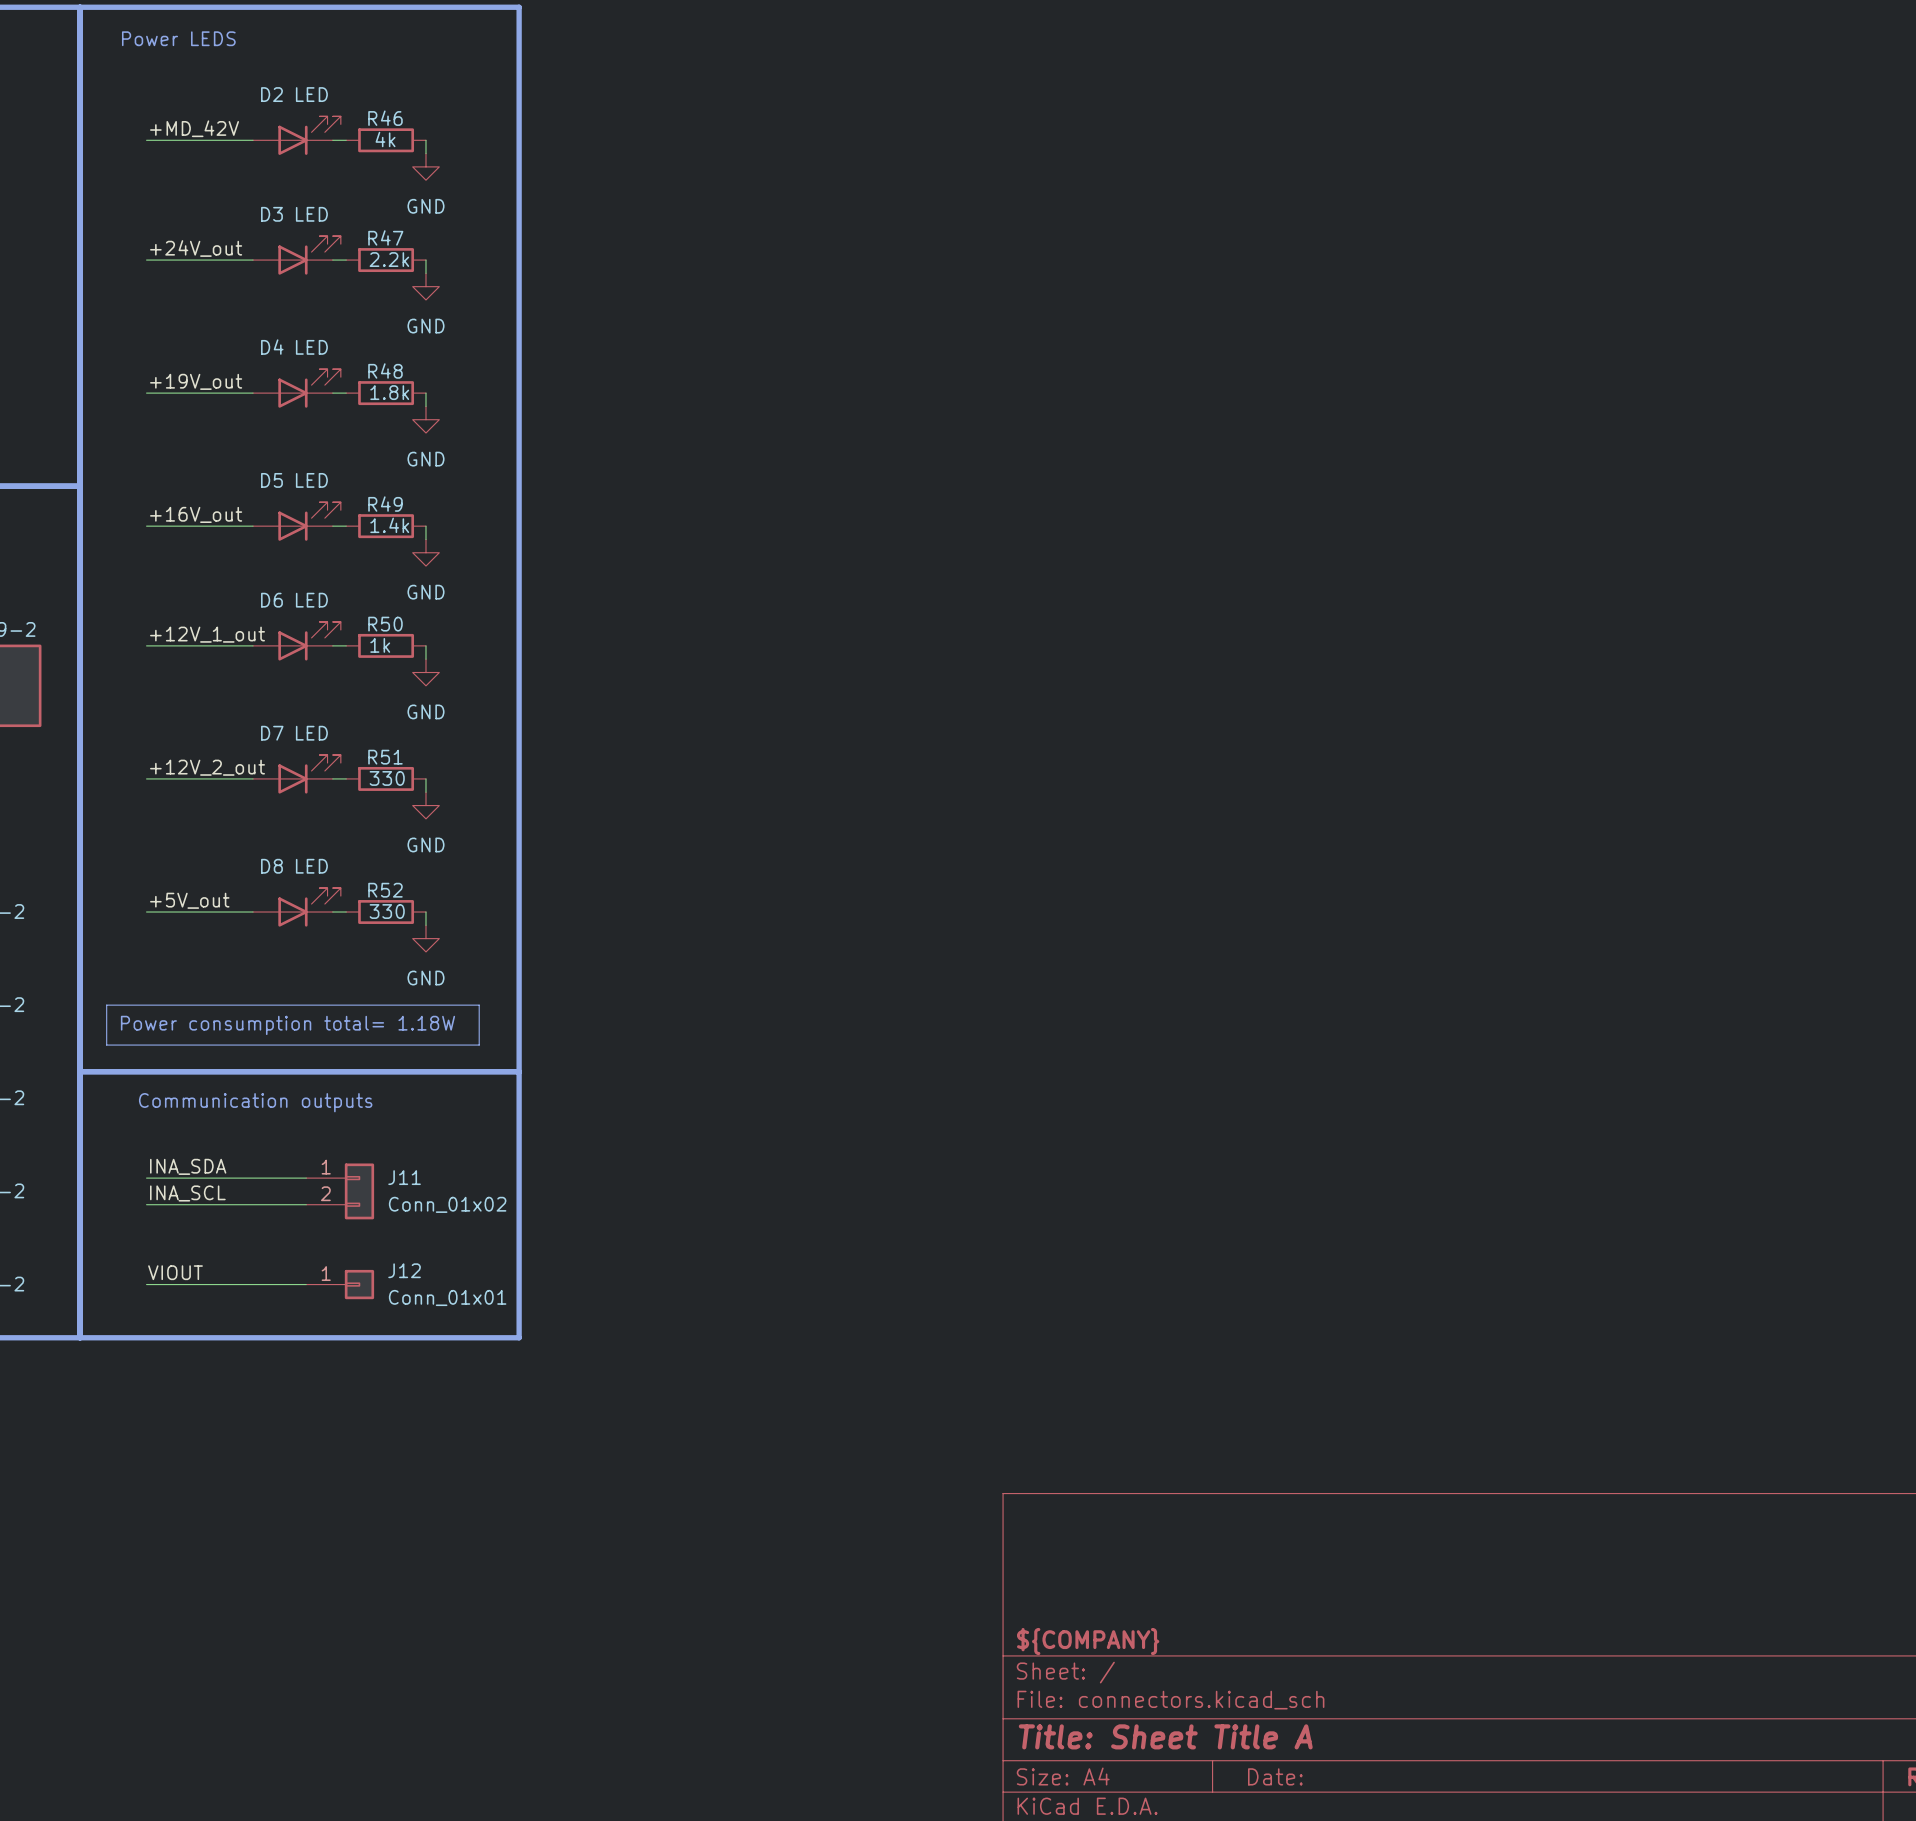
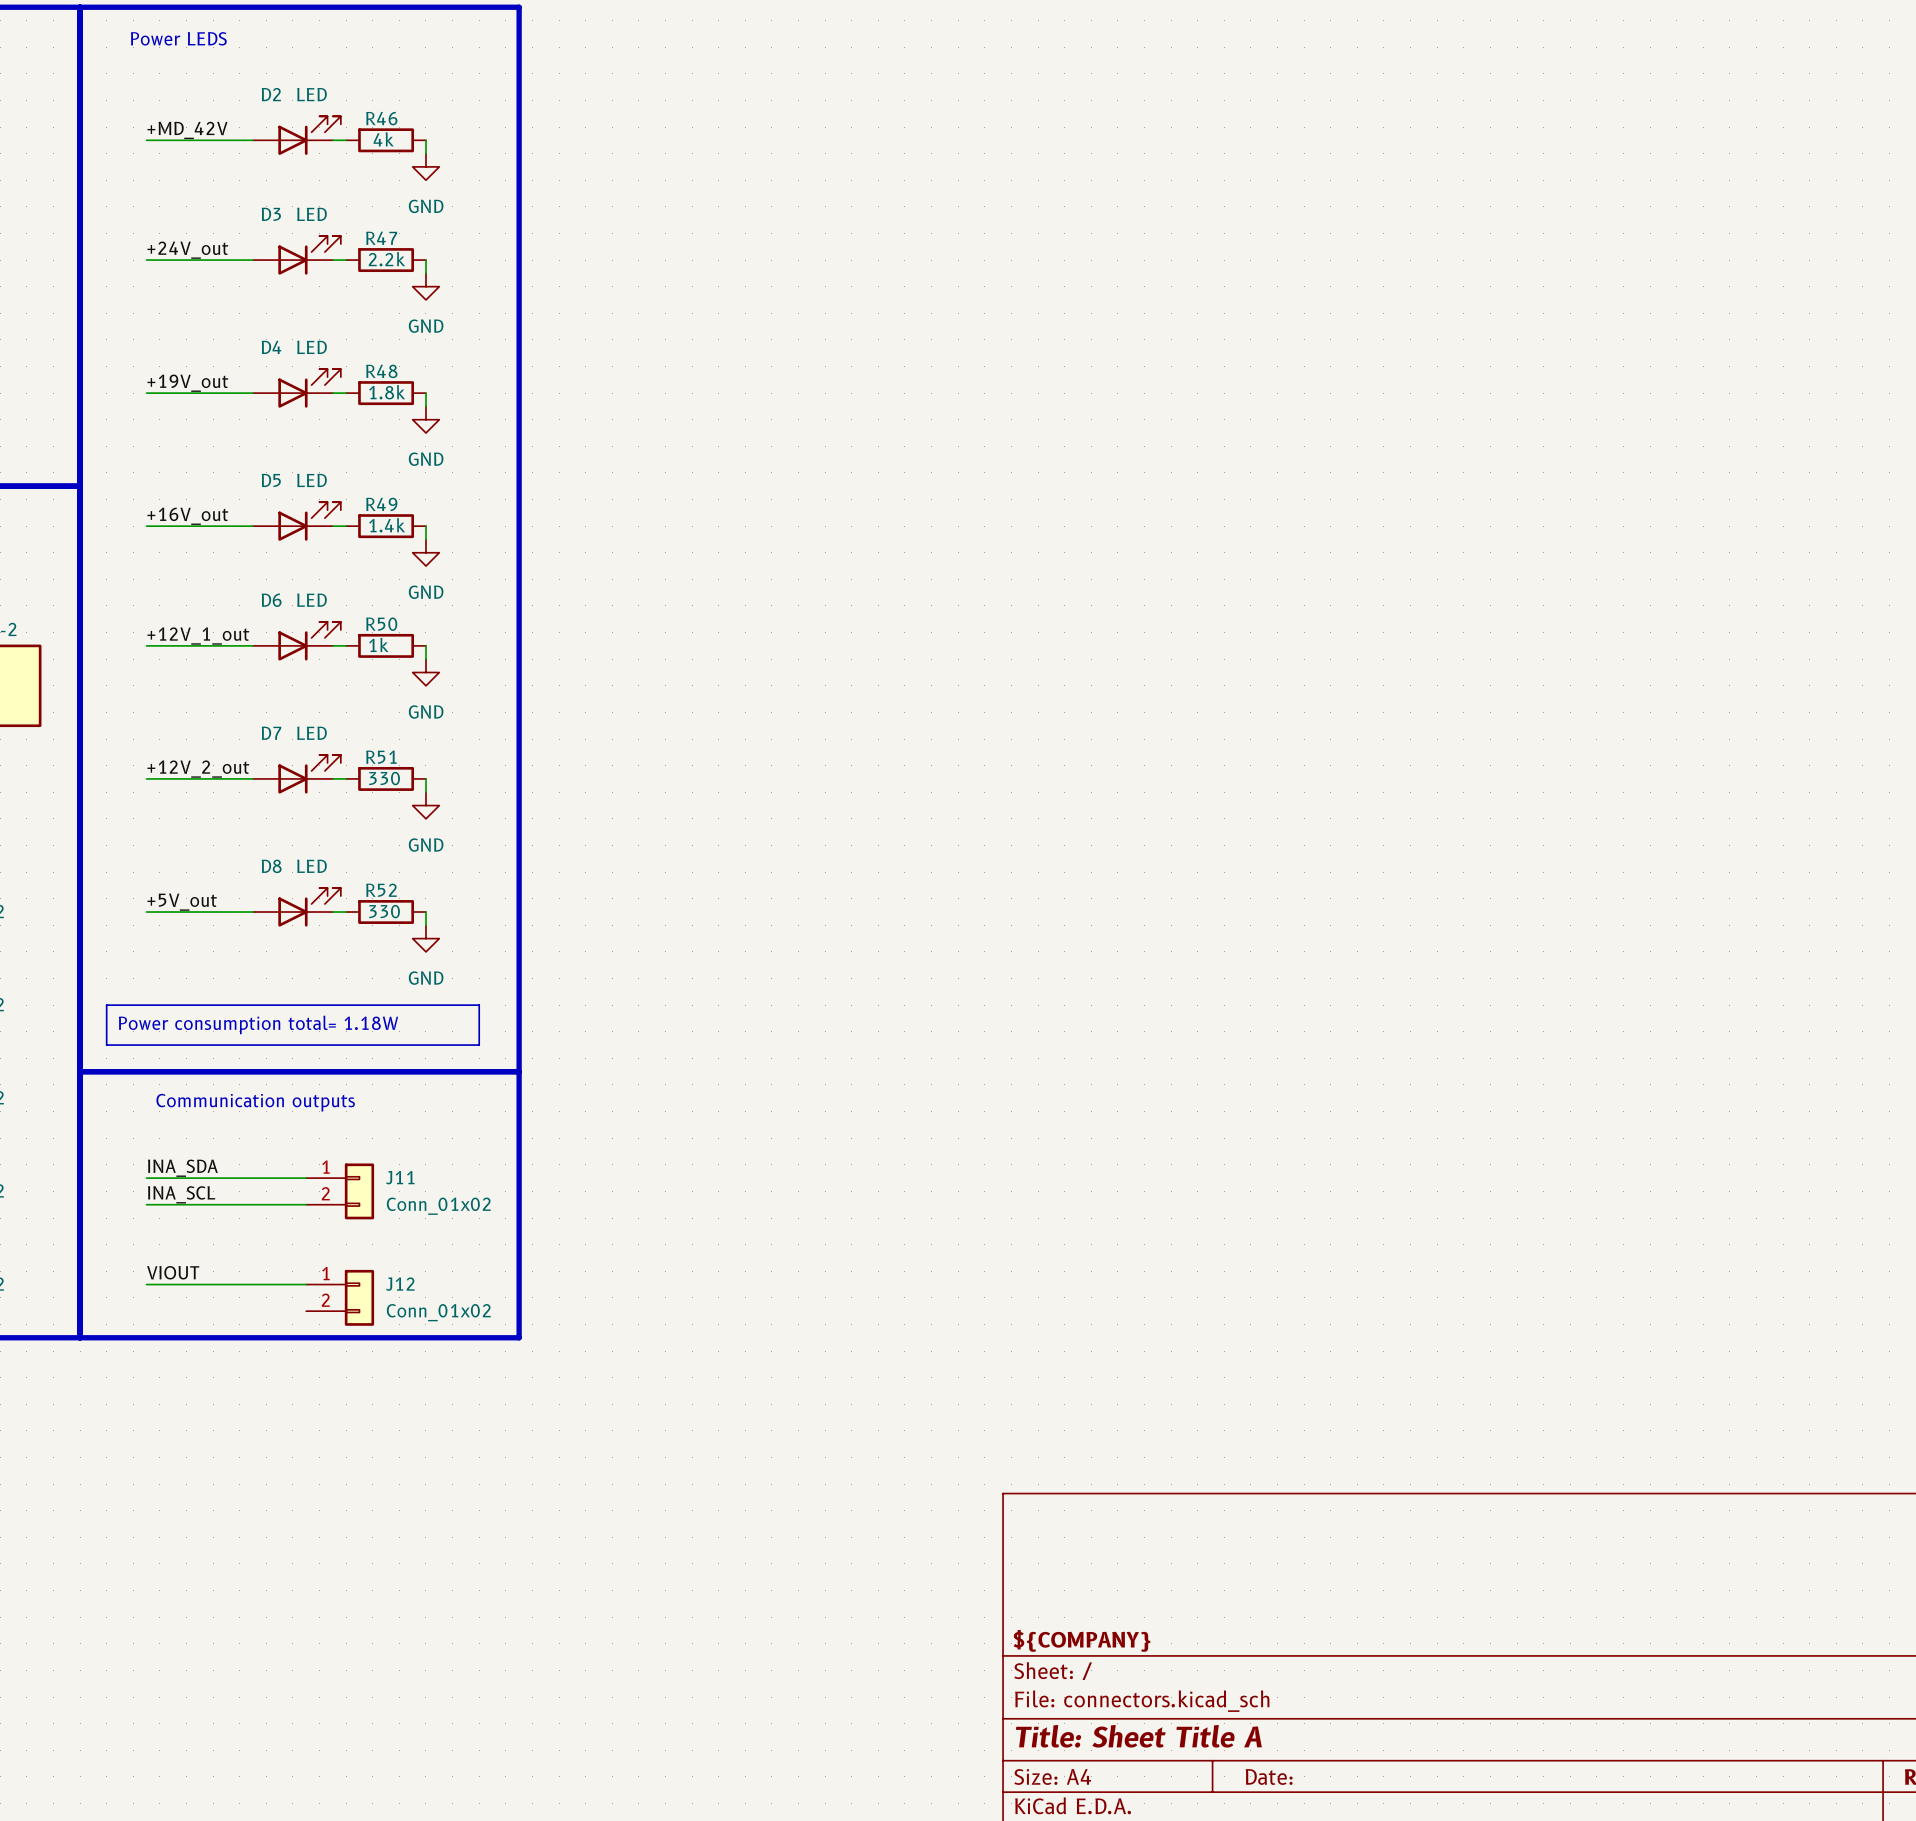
J12 symbol: [306, 1269, 375, 1300] -> [306, 1269, 375, 1326]
J12 value: Conn_01x01 (447, 1297) -> Conn_01x02 (438, 1312)

